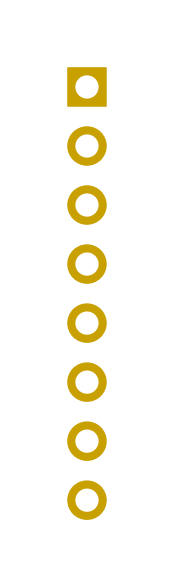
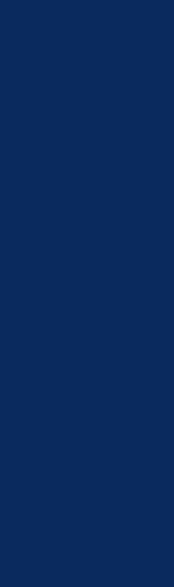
part: (86, 293) -> none

